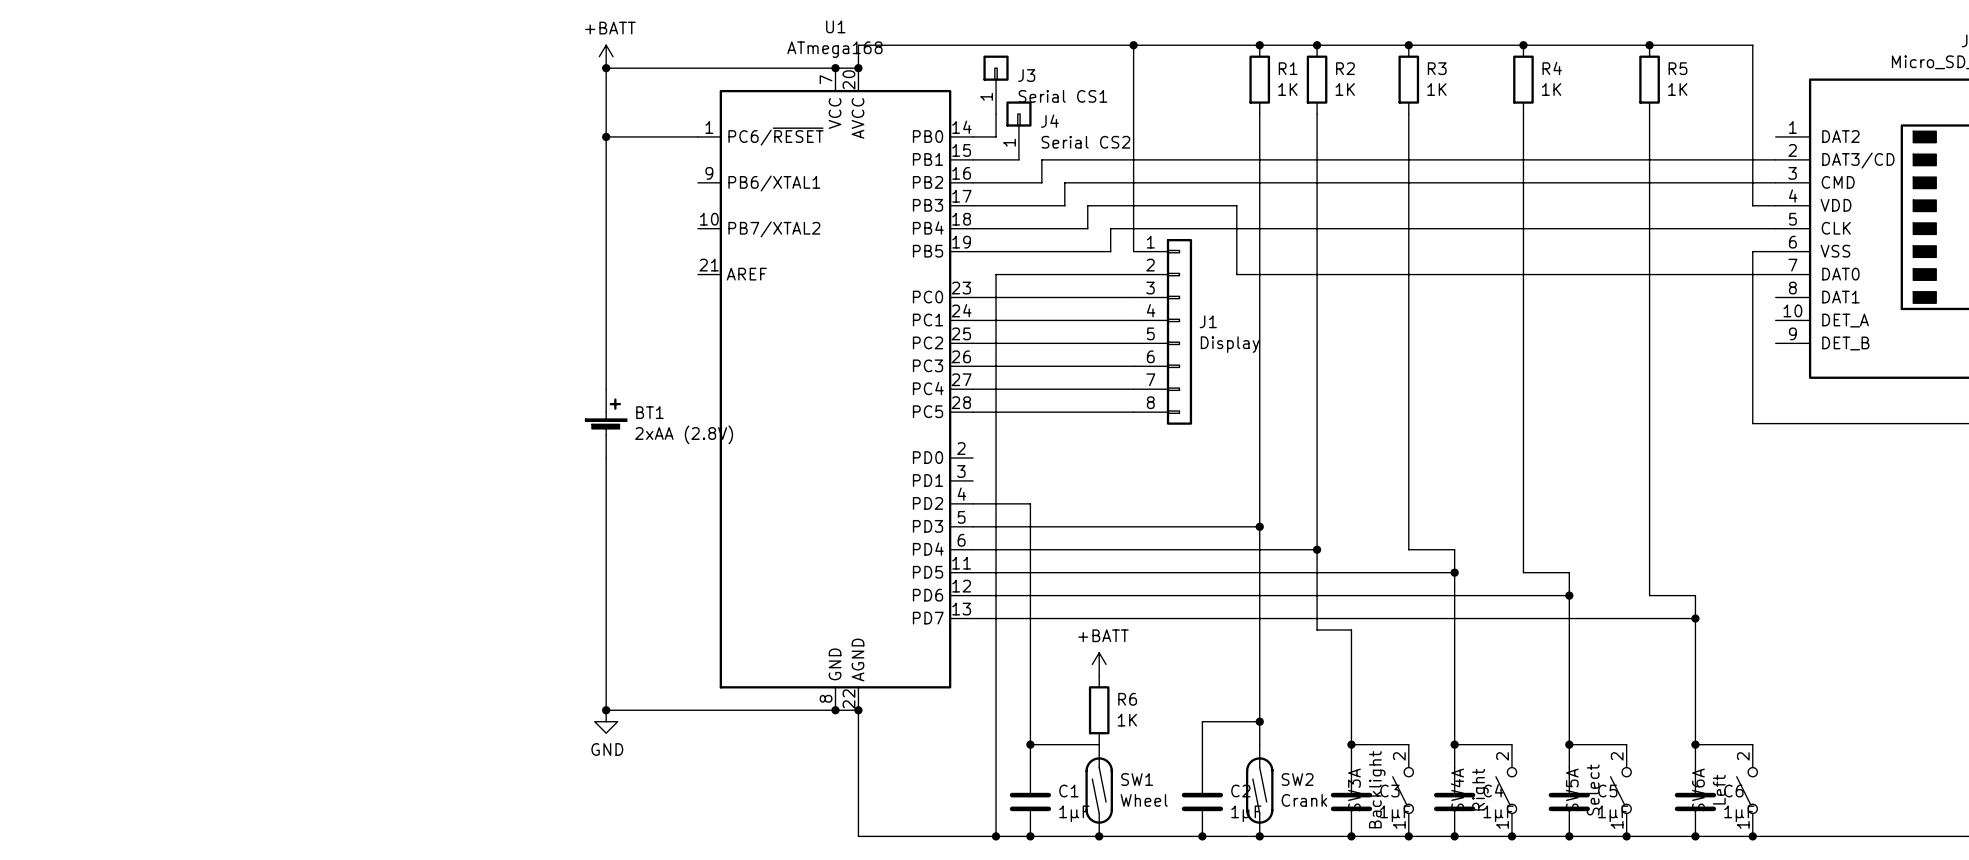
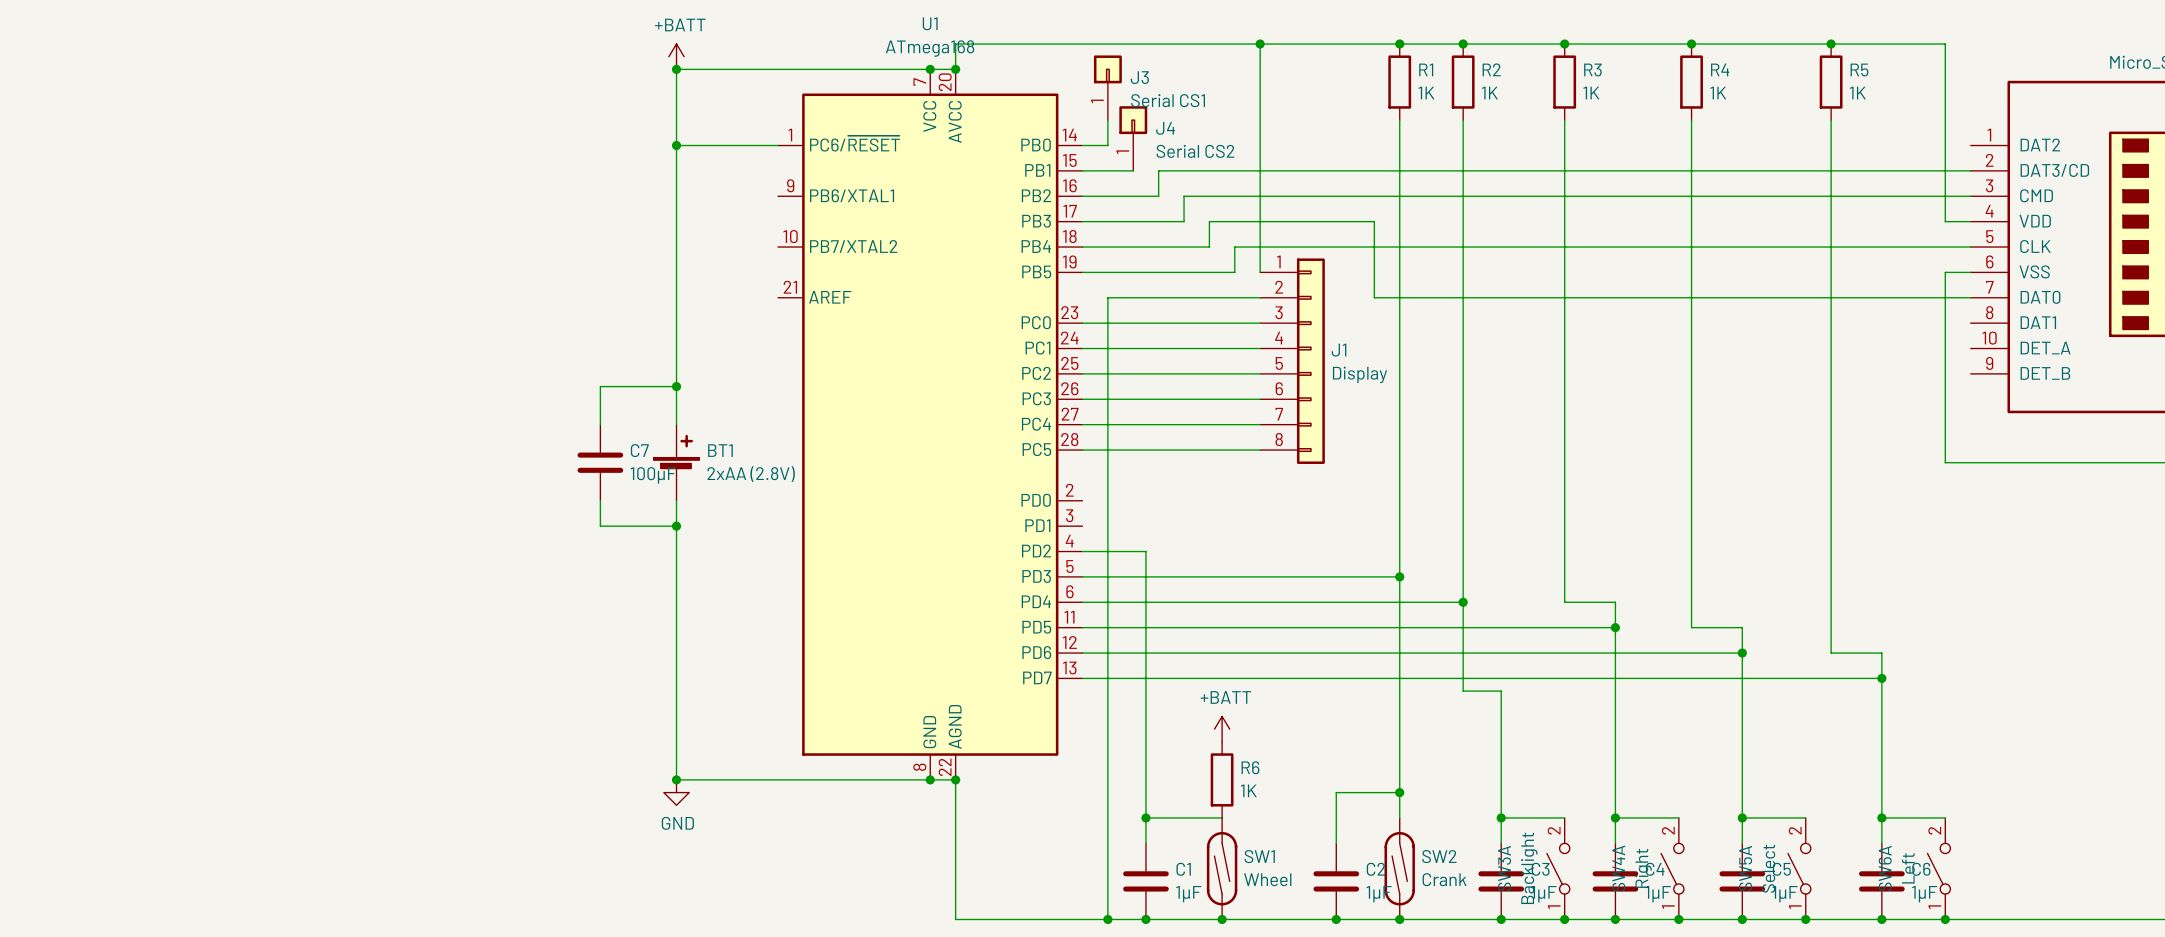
wire: none -> (676, 386) (600, 386) (600, 424)
junction: none -> (676, 386)
C7: none -> 100µF (600, 462)
wire: none -> (600, 500) (600, 526) (676, 526)
junction: none -> (676, 526)

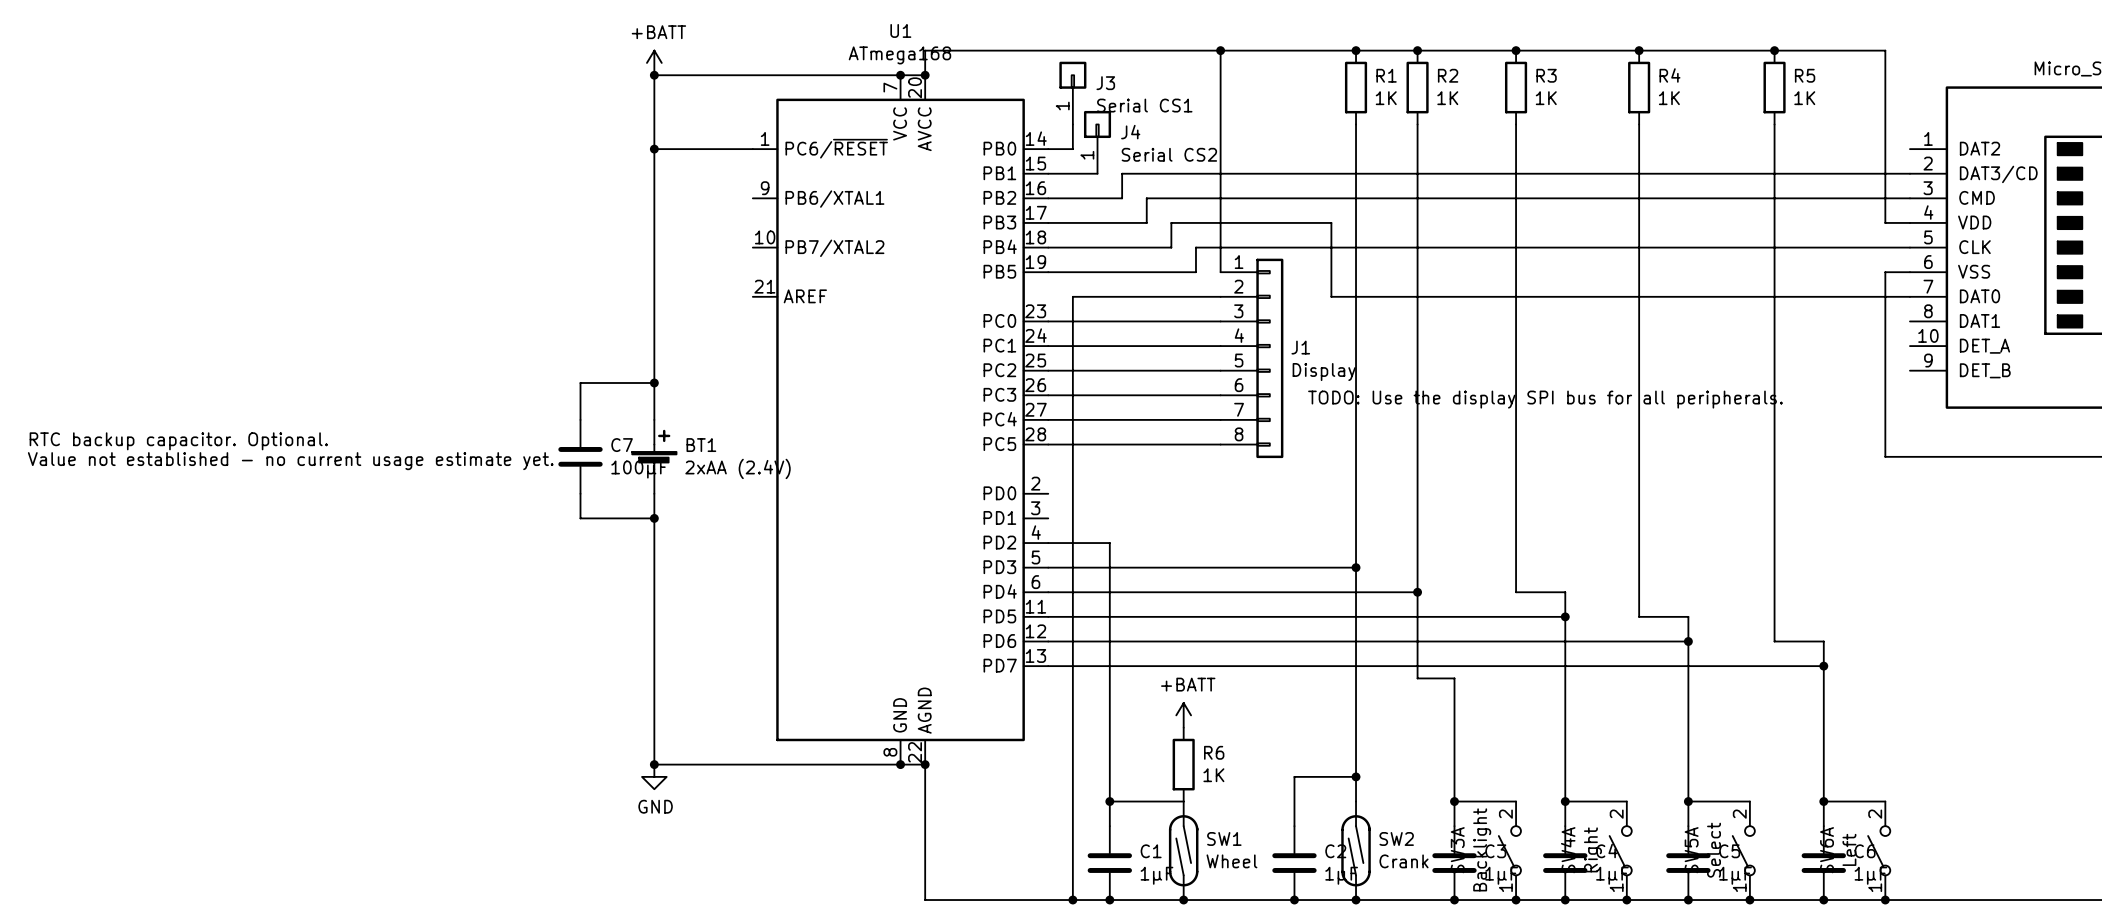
text: none -> TODO: Use the display SPI bus for all peripherals. (1545, 399)
text: none -> RTC backup capacitor. Optional. (178, 441)
text: none -> Value not established - no current usage estimate yet. (290, 461)
BT1 value: 2xAA (2.8V) (751, 474) -> 2xAA (2.4V) (738, 468)

